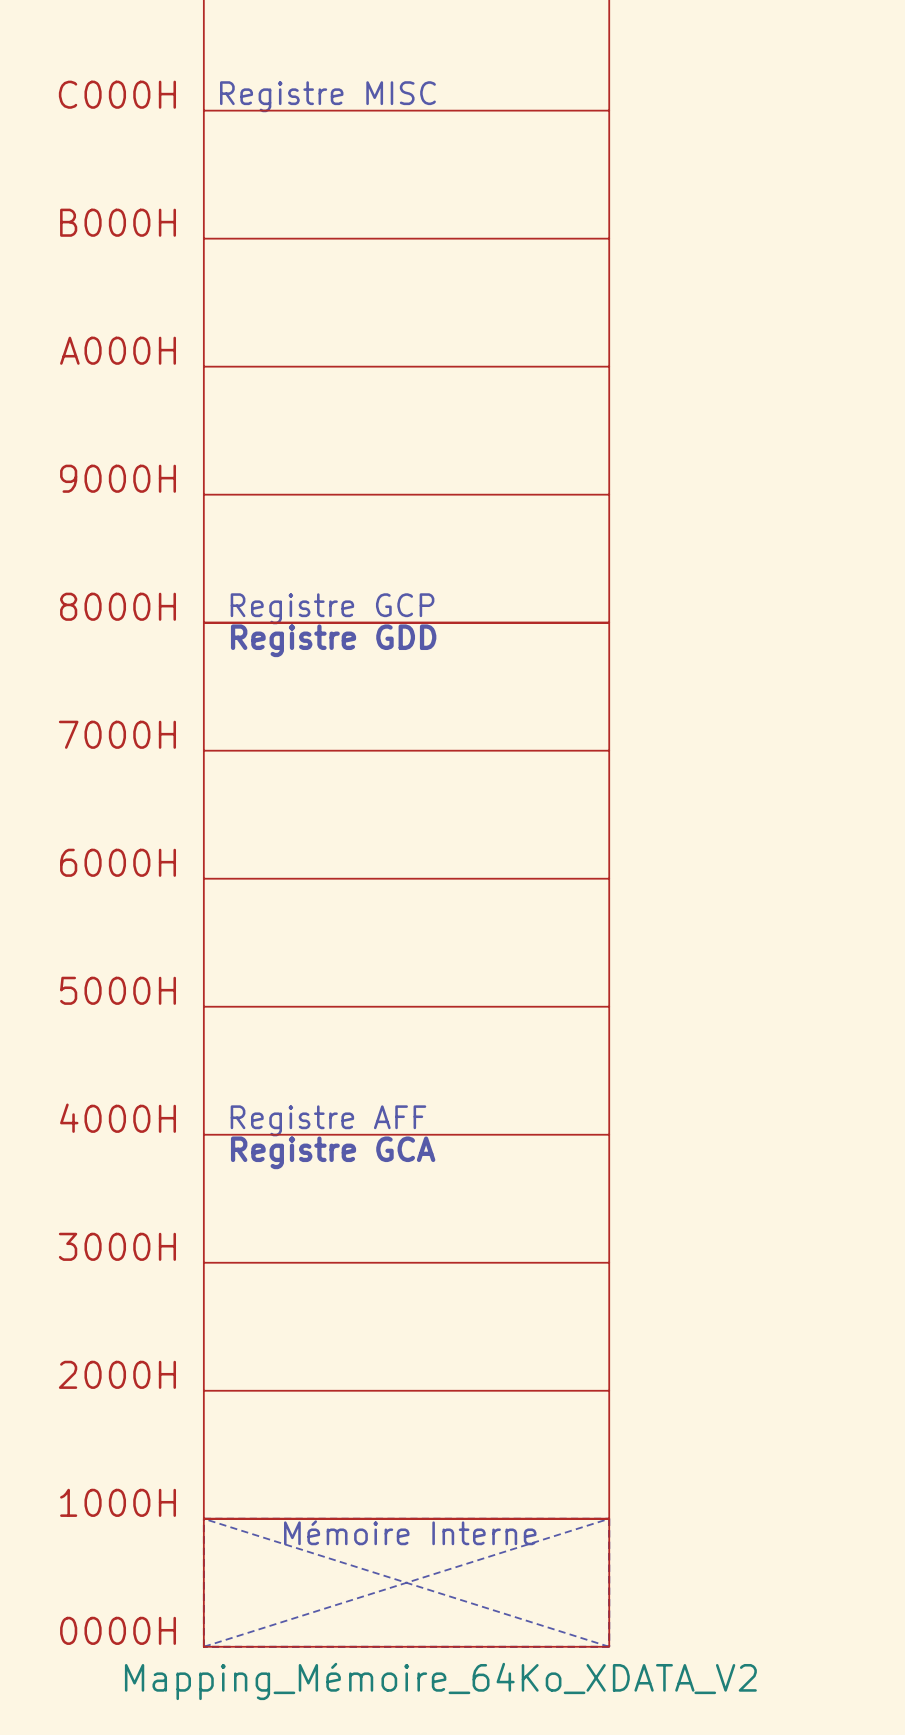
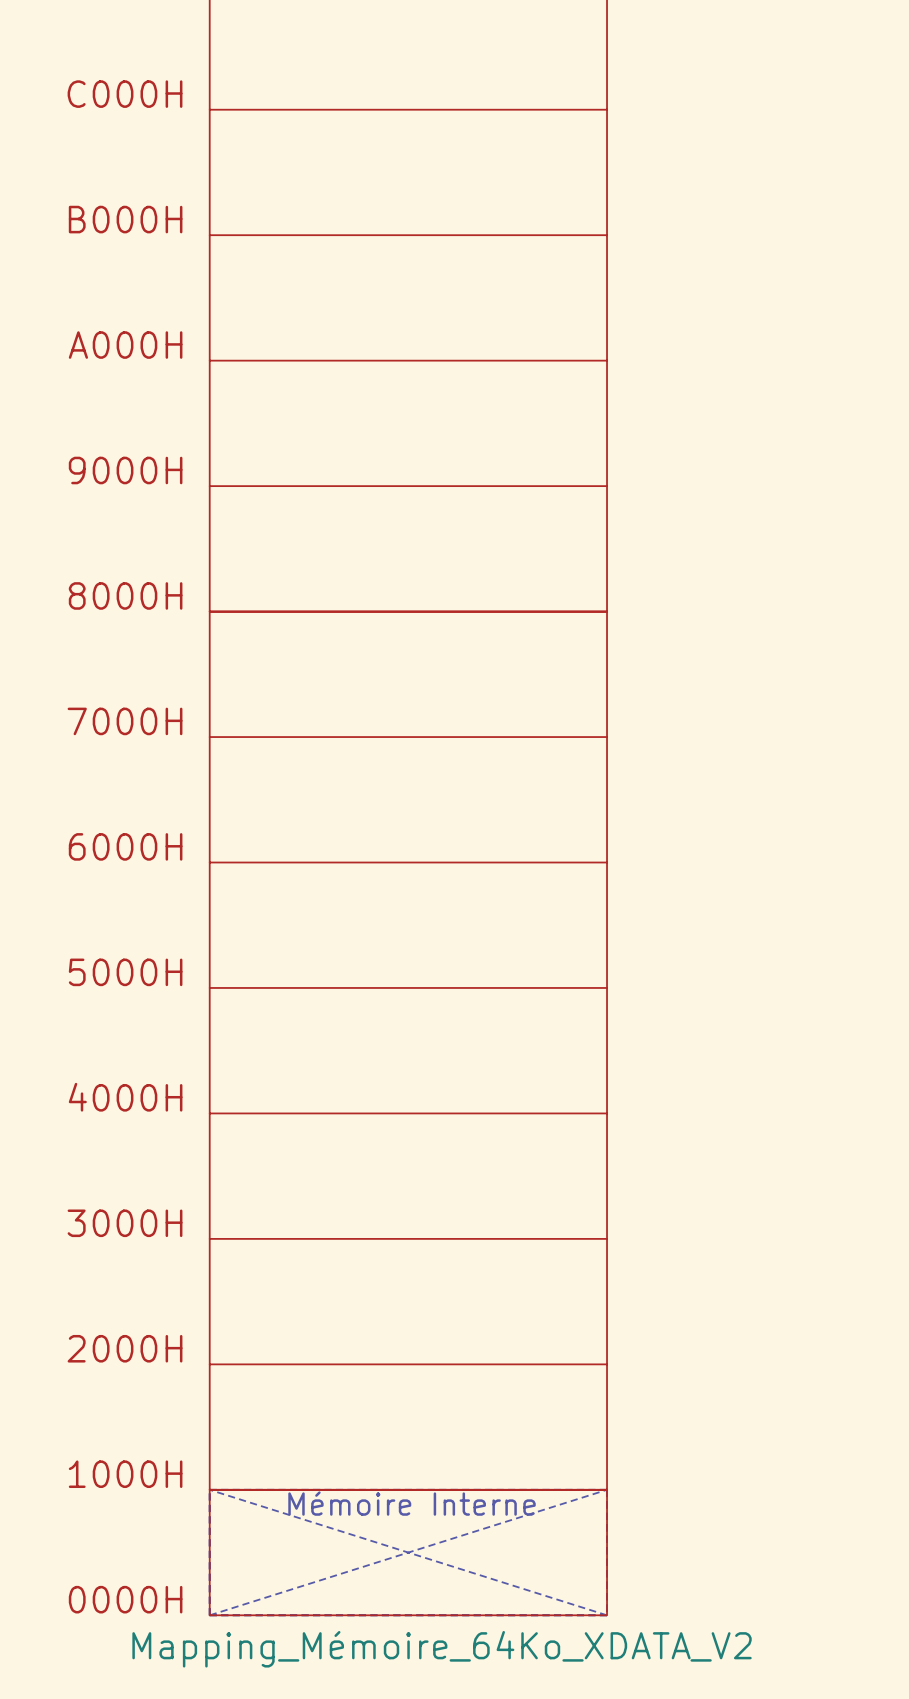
text: Registre MISC (327, 96) -> none
text: Registre GCP (332, 608) -> none
text: Registre GDD (333, 640) -> none
text: Registre AFF (328, 1120) -> none
text: Registre GCA (333, 1152) -> none

